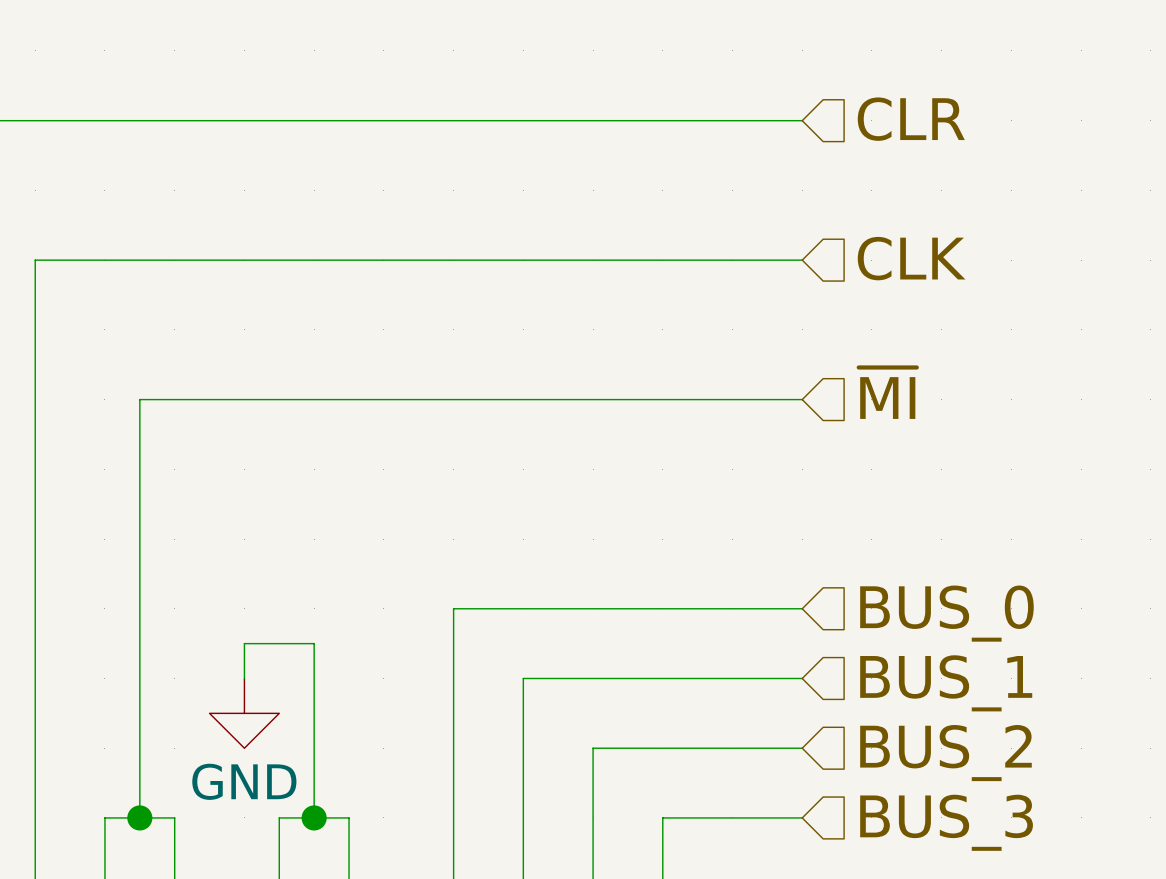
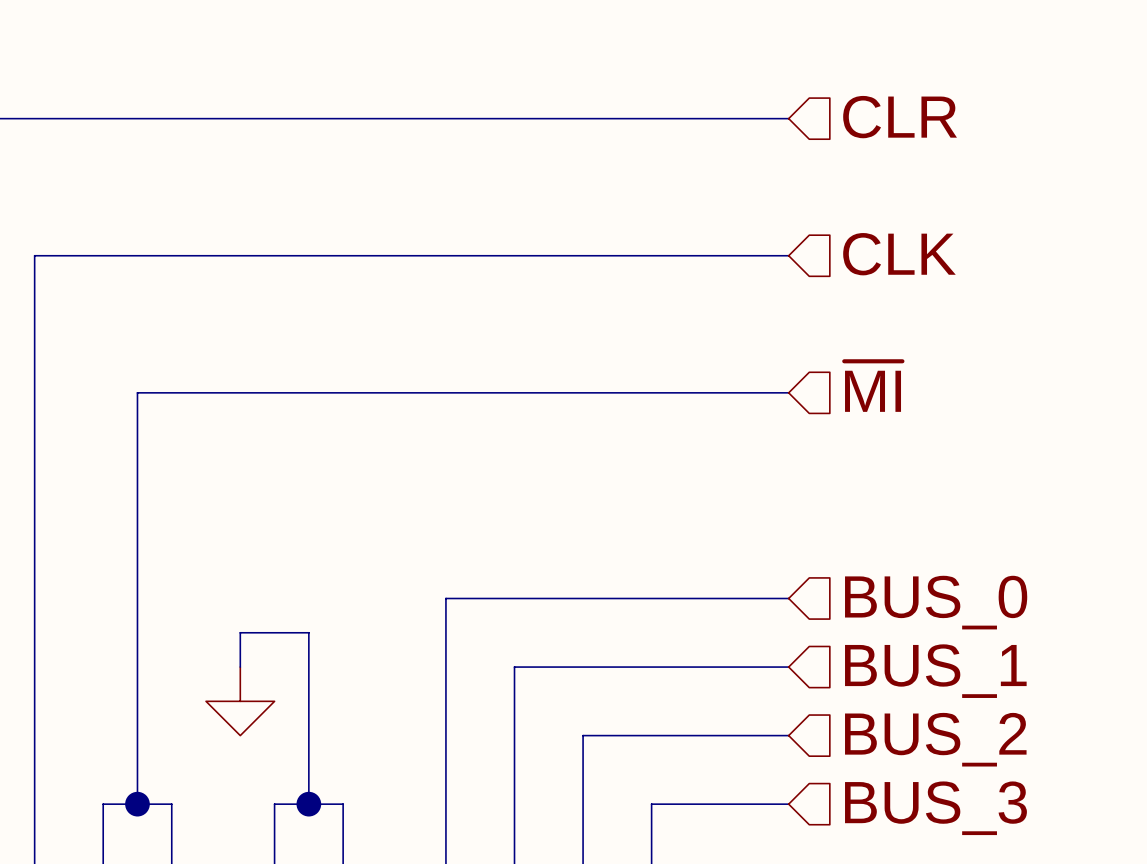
power symbol text: GND (244, 781) -> none

